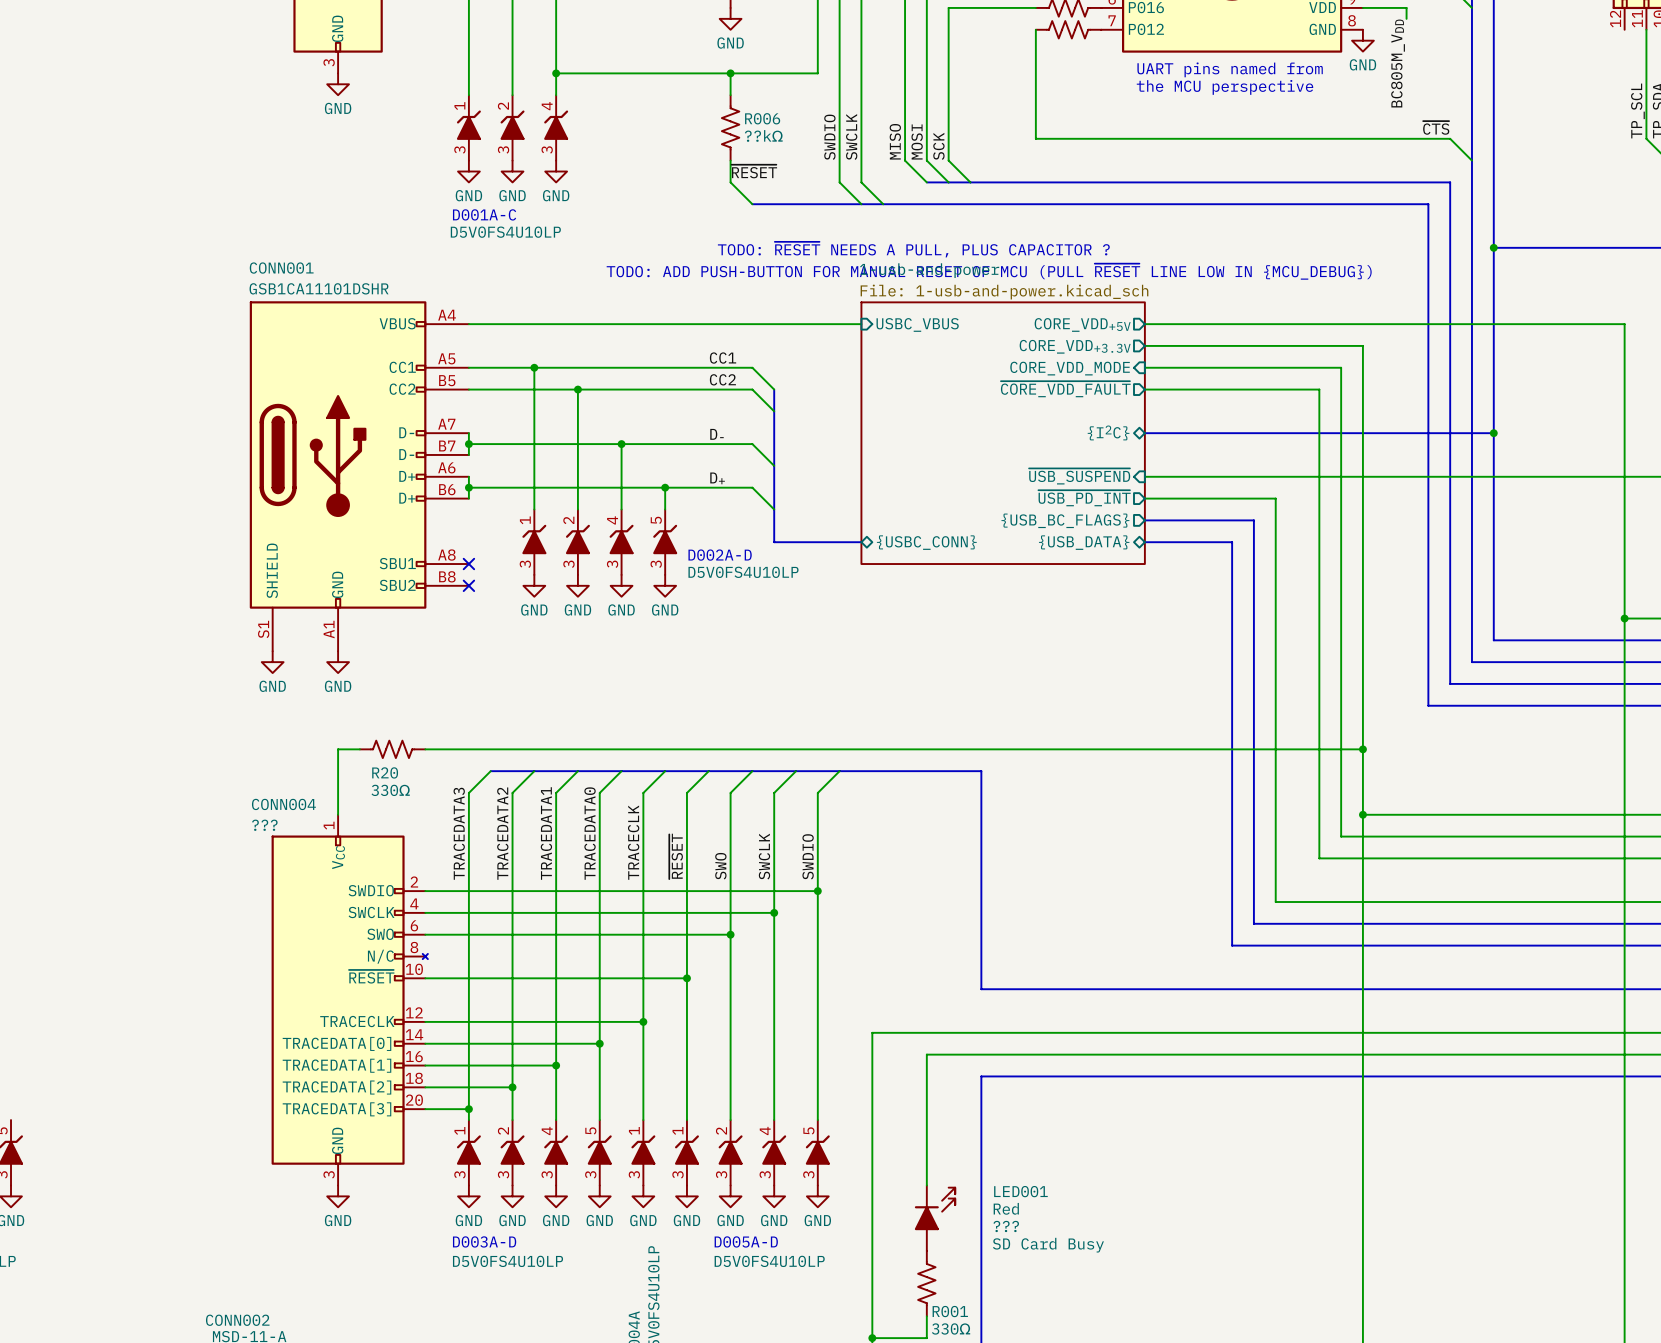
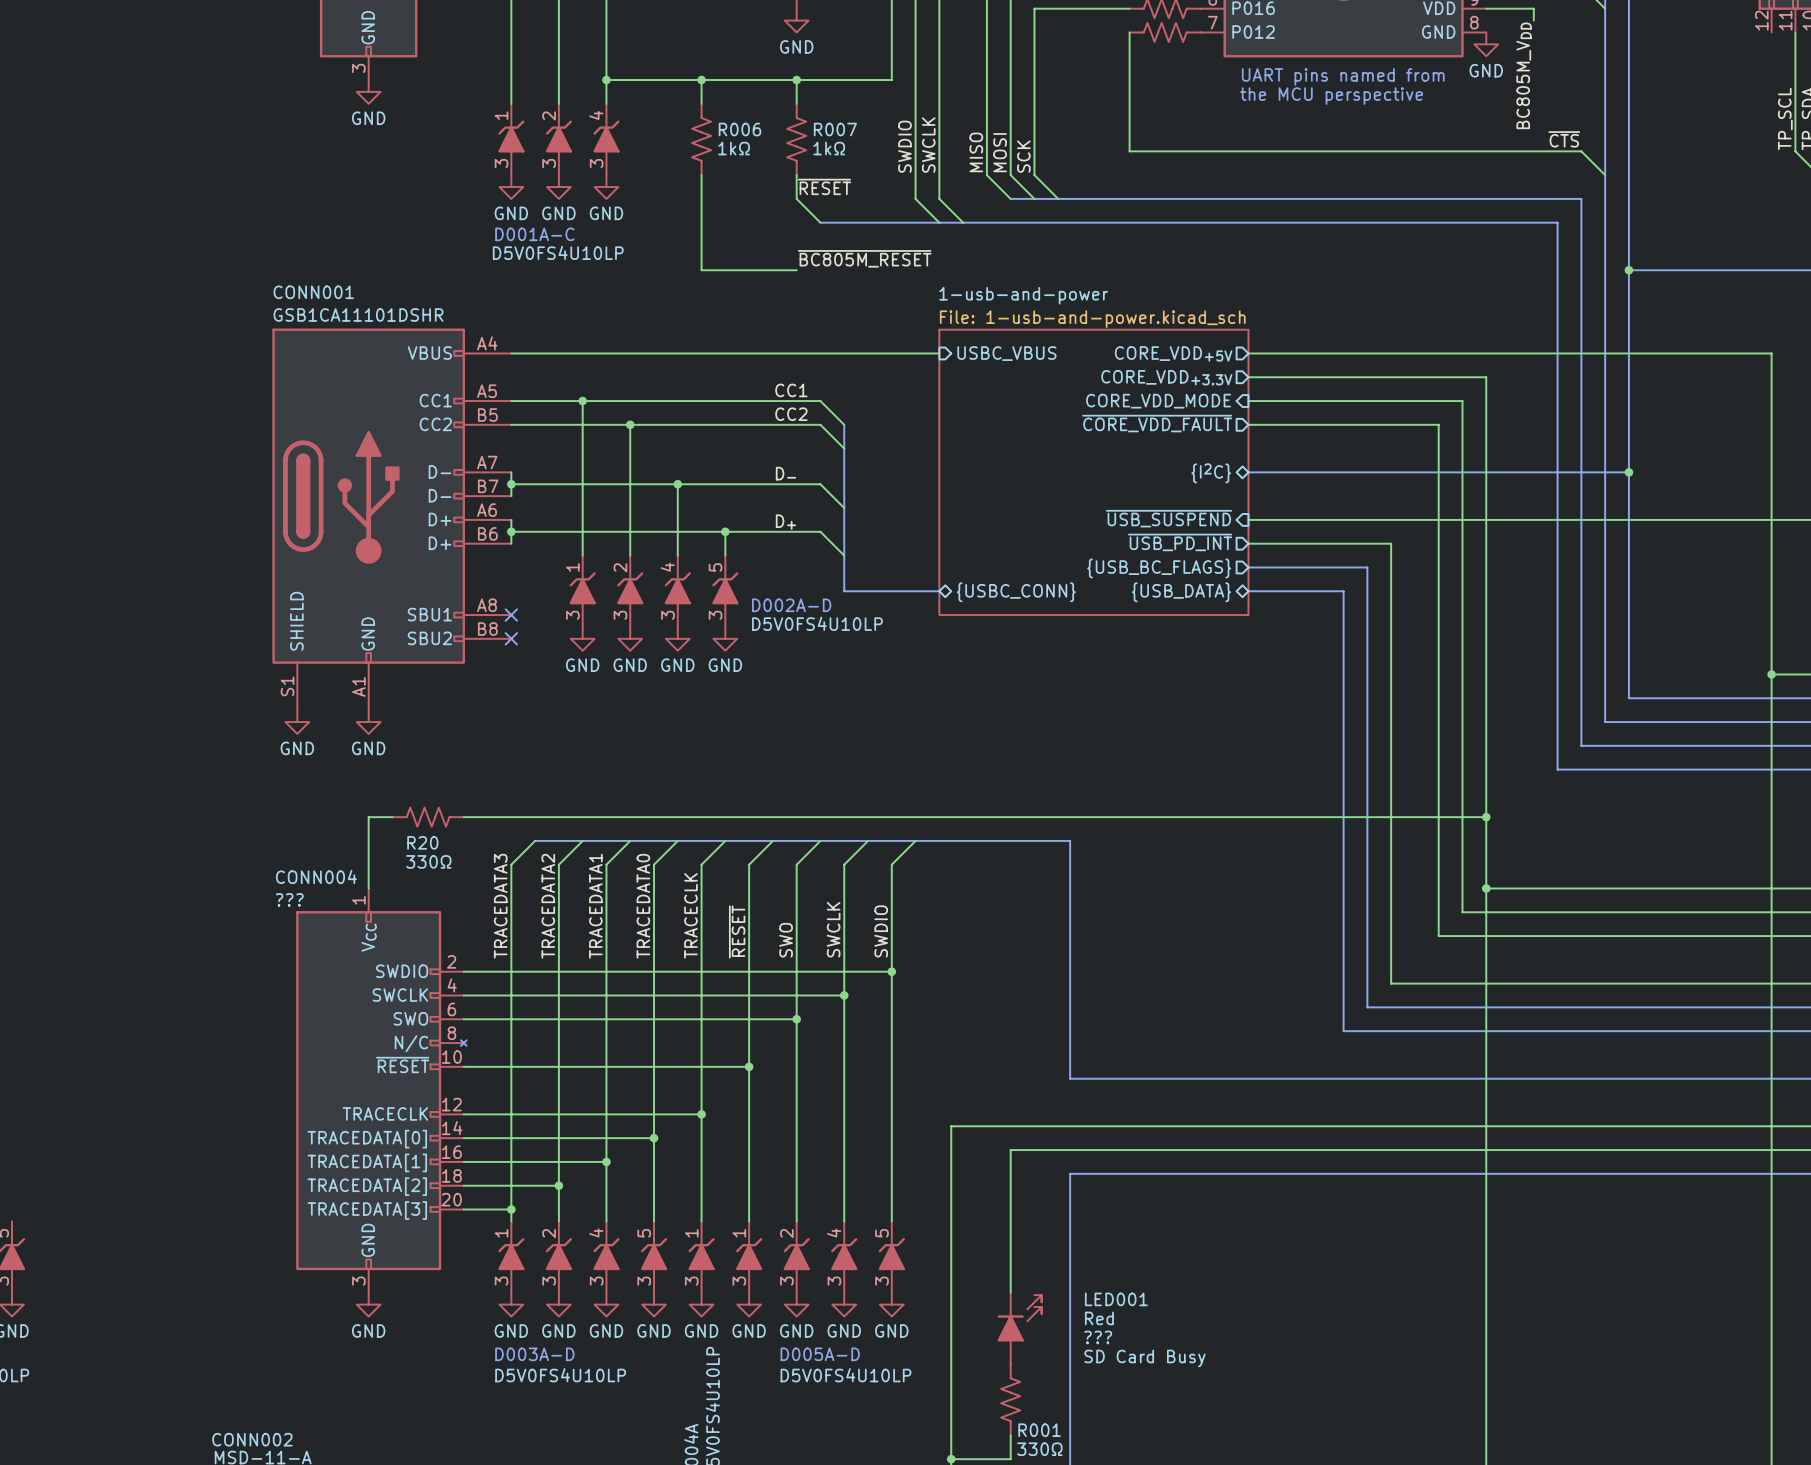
wire: none -> (701, 80) (701, 103)
junction: none -> (701, 80)
R006 name: R006 (762, 118) -> R007 (835, 129)
R006: none -> 1kΩ (701, 139)
R006 value: ??kΩ (763, 135) -> 1kΩ (829, 148)
wire: none -> (701, 175) (701, 270) (796, 270)
label: none -> ~{BC805M_RESET} (864, 258)
text: TODO: ~{RESET} NEEDS A PULL, PLUS CAPACITOR ? (913, 249) -> none
text: TODO: ADD PUSH-BUTTON FOR MANUAL RESET OF MCU (PULL ~{RESET} LINE LOW IN {MCU_DEBUG}) (989, 271) -> none

